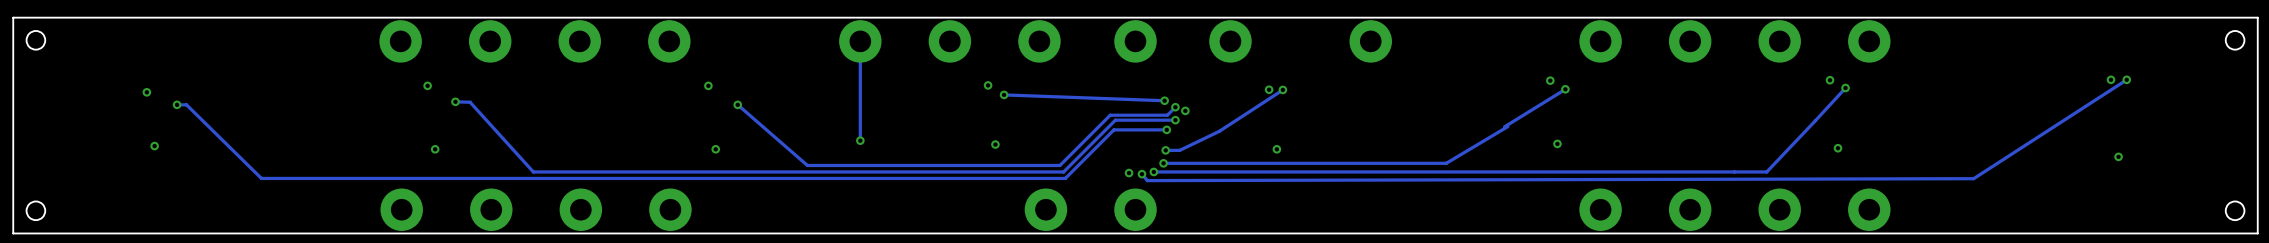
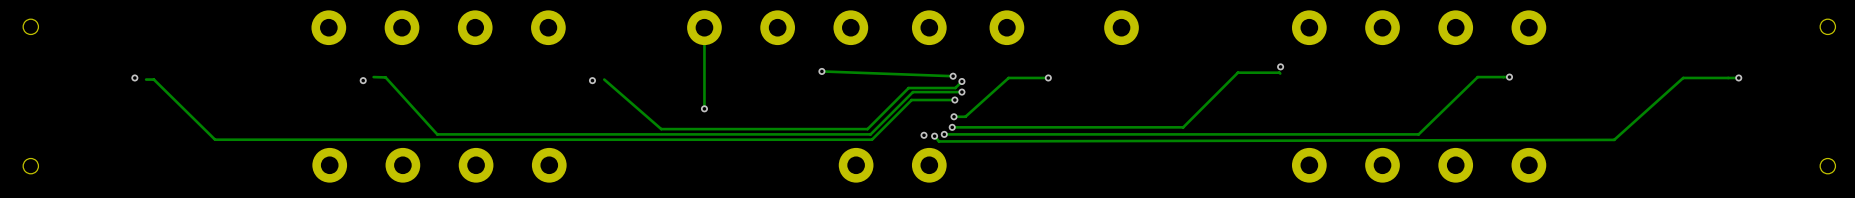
board edge: (2257, 17) (2257, 233) (13, 233) (13, 17) (2257, 17) -> none
via: (2111, 79) -> none
track: (2126, 79) (1973, 178) -> (1738, 77) (1683, 77) (1614, 139)
via: (2126, 79) -> none
via: (1550, 80) -> none
via: (1830, 80) -> none
via: (427, 85) -> none
via: (708, 85) -> none
via: (988, 85) -> none
track: (1845, 88) (1766, 171) (1734, 171) -> (1509, 77) (1477, 77) (1418, 134)
via: (1845, 88) -> none
via: (1269, 89) -> none
track: (1282, 89) (1219, 131) (1179, 150) -> (1048, 77) (1008, 77) (965, 116)
via: (1282, 89) -> none
track: (1565, 89) (1504, 126) -> none
via: (146, 92) -> none
via: (455, 101) -> none
via: none -> (1509, 77)
via: none -> (134, 77)
via: none -> (1048, 77)
via: none -> (1738, 77)
via: (177, 104) -> none
via: (737, 104) -> none
via: none -> (363, 80)
via: none -> (592, 80)
via: (1185, 110) -> none
track: (1507, 126) (1446, 163) -> (1280, 73) (1237, 72) (1183, 127)
via: (1557, 143) -> none
via: (995, 144) -> none
via: (154, 146) -> none
via: (1837, 148) -> none
via: (435, 149) -> none
via: (715, 149) -> none
via: (1276, 149) -> none
via: (2118, 156) -> none

